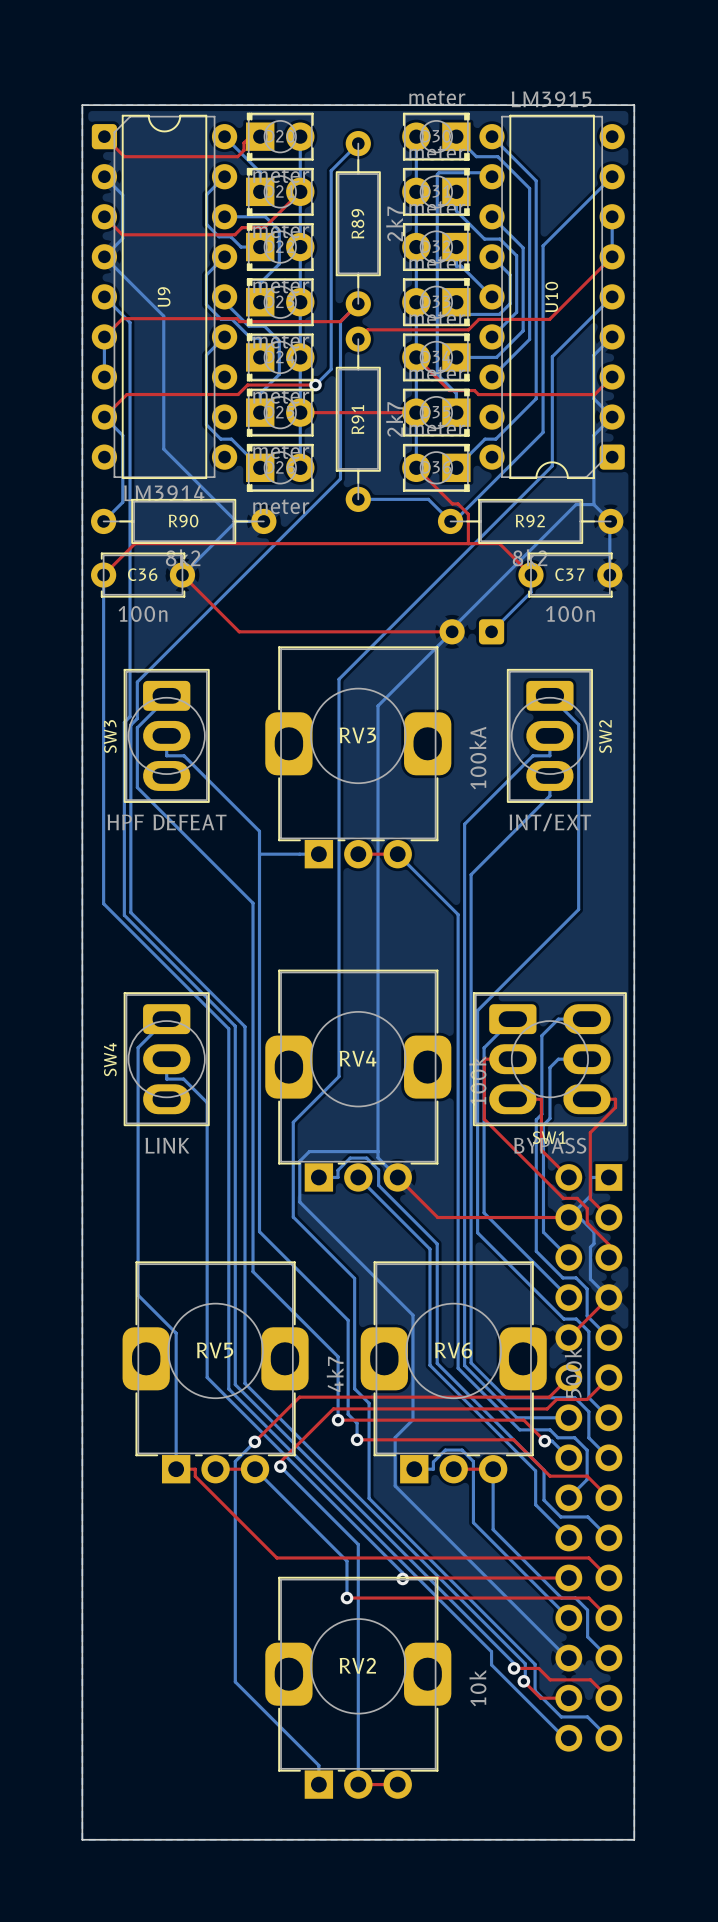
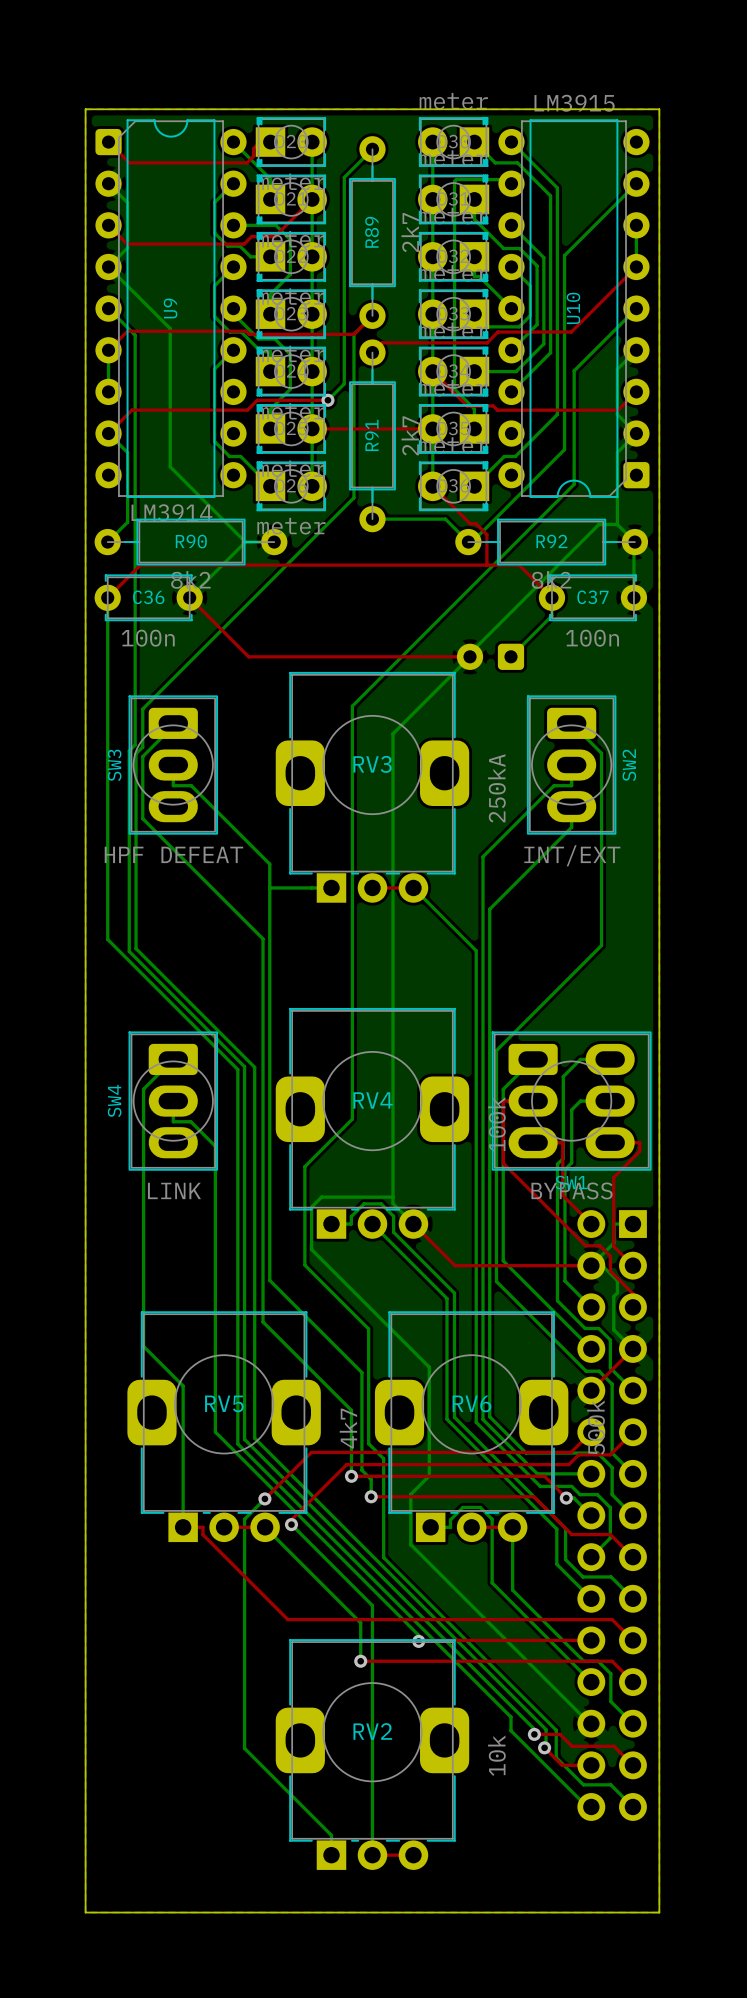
RV3 value: 100kA (477, 758) -> 250kA (496, 788)

